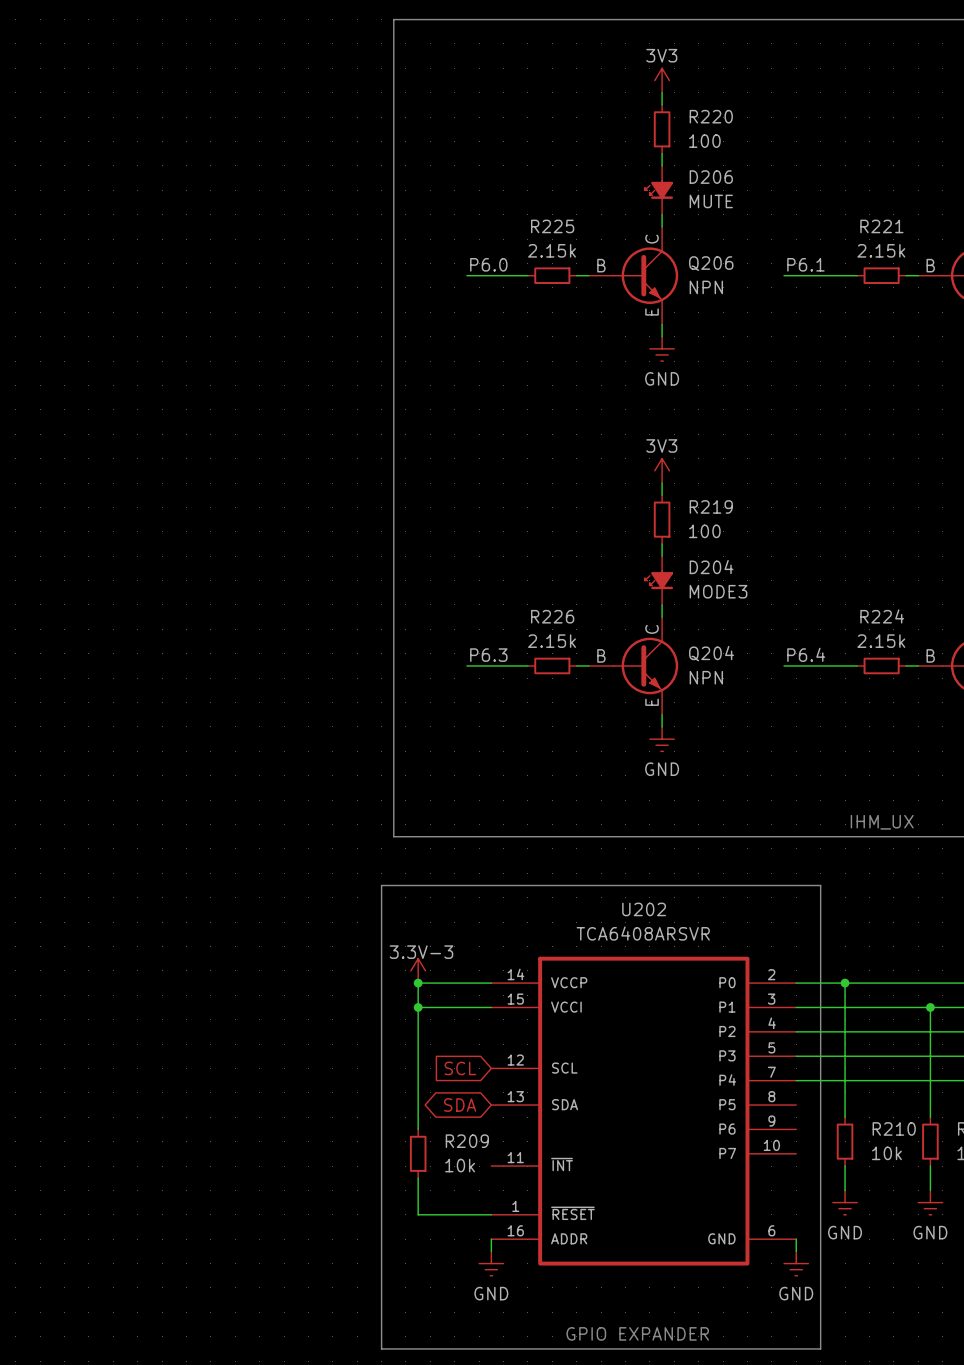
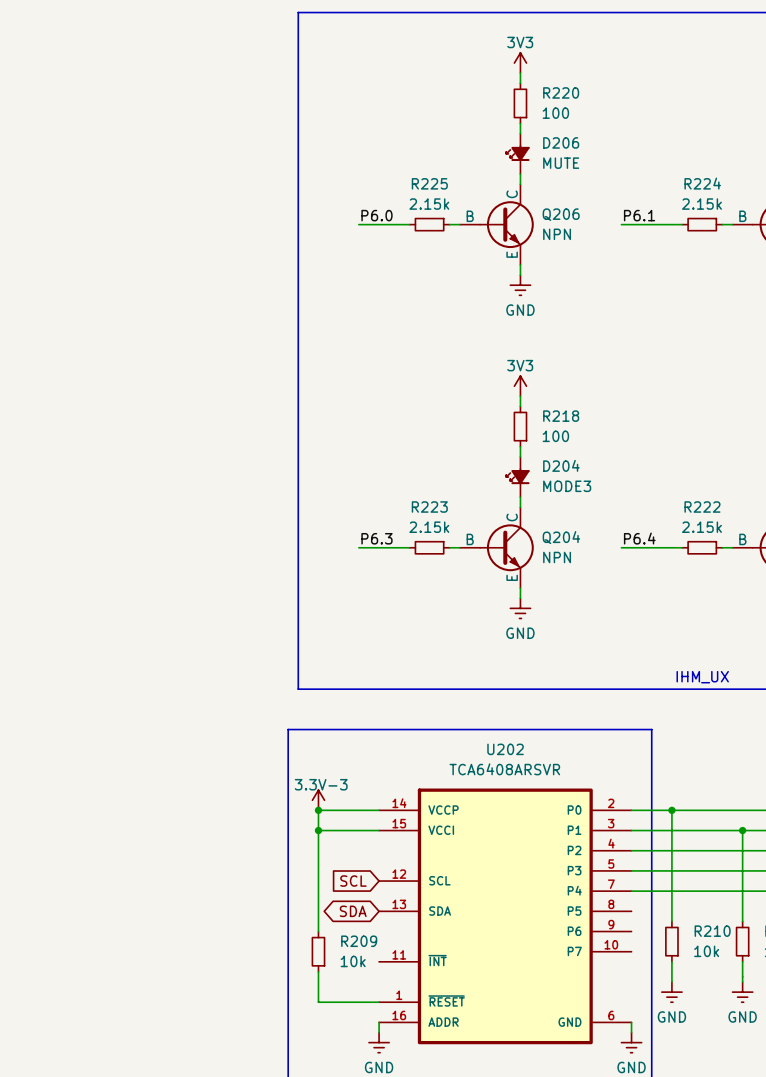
R221 name: R221 (881, 226) -> R224 (702, 183)
R219 name: R219 (711, 506) -> R218 (561, 416)
R226 name: R226 (552, 616) -> R223 (429, 507)
R224 name: R224 (882, 616) -> R222 (702, 507)

